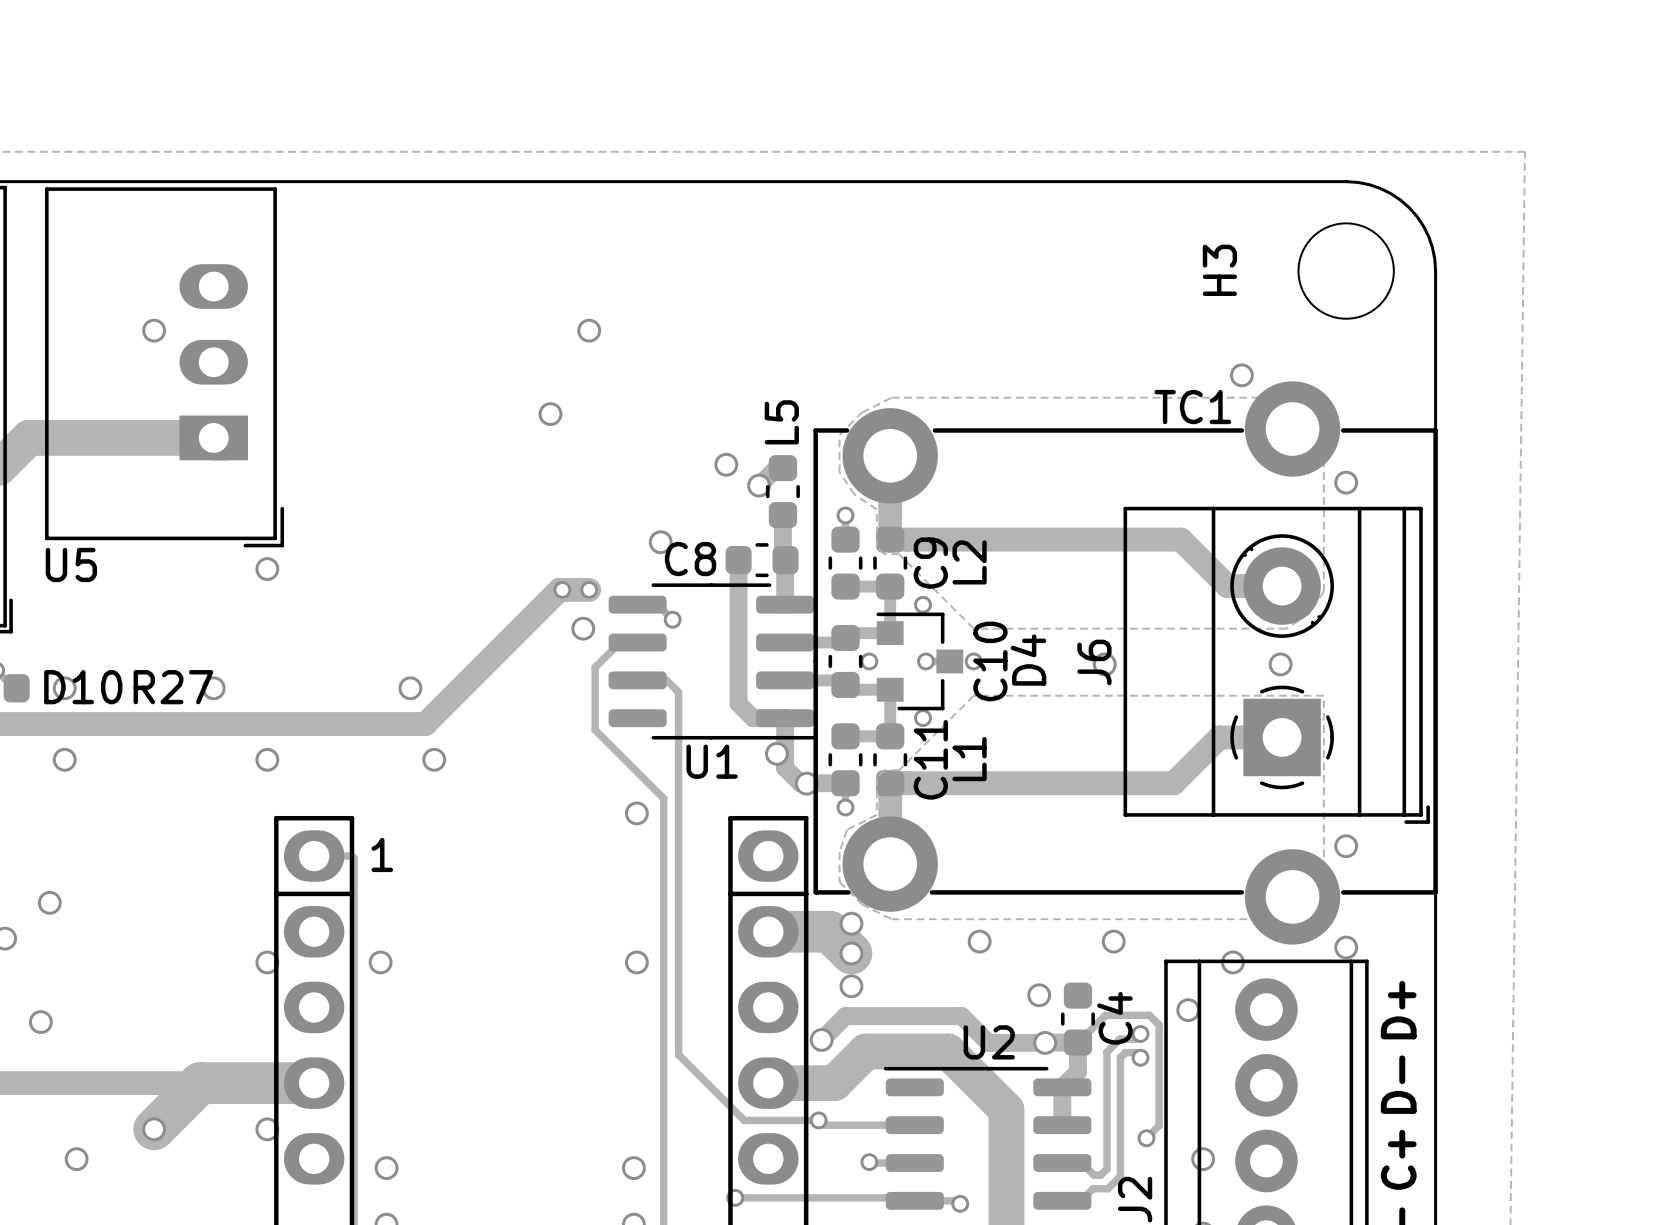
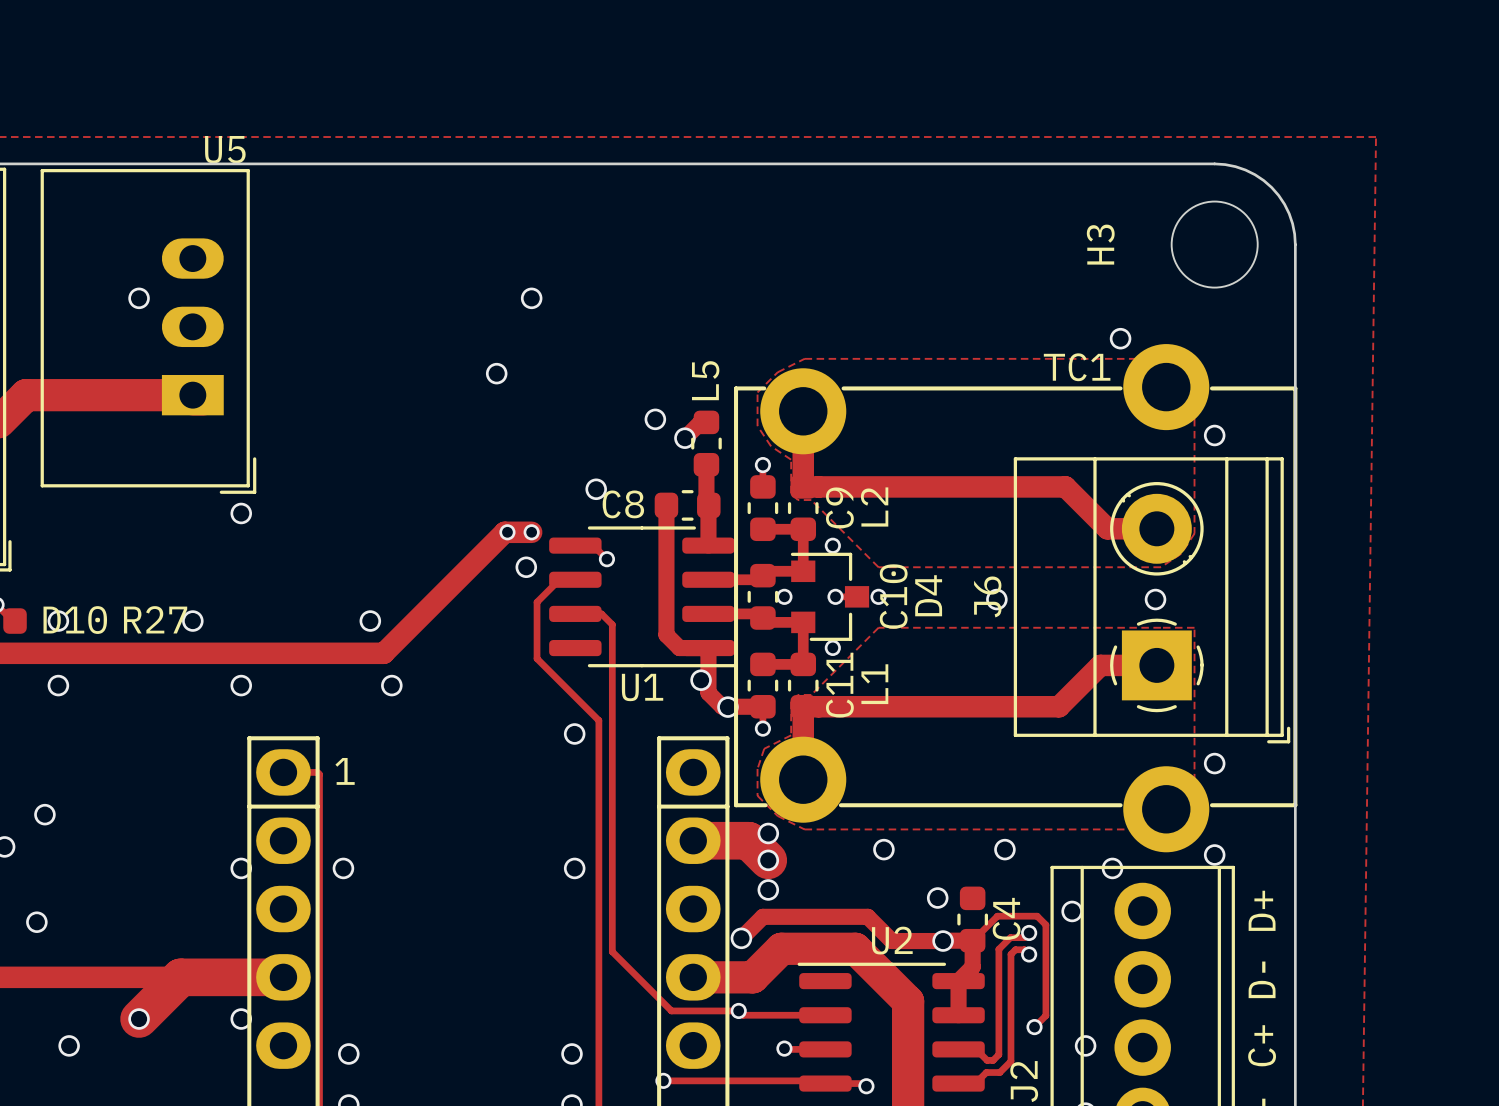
U5 name position: U5 (71, 564) -> U5 (225, 149)

